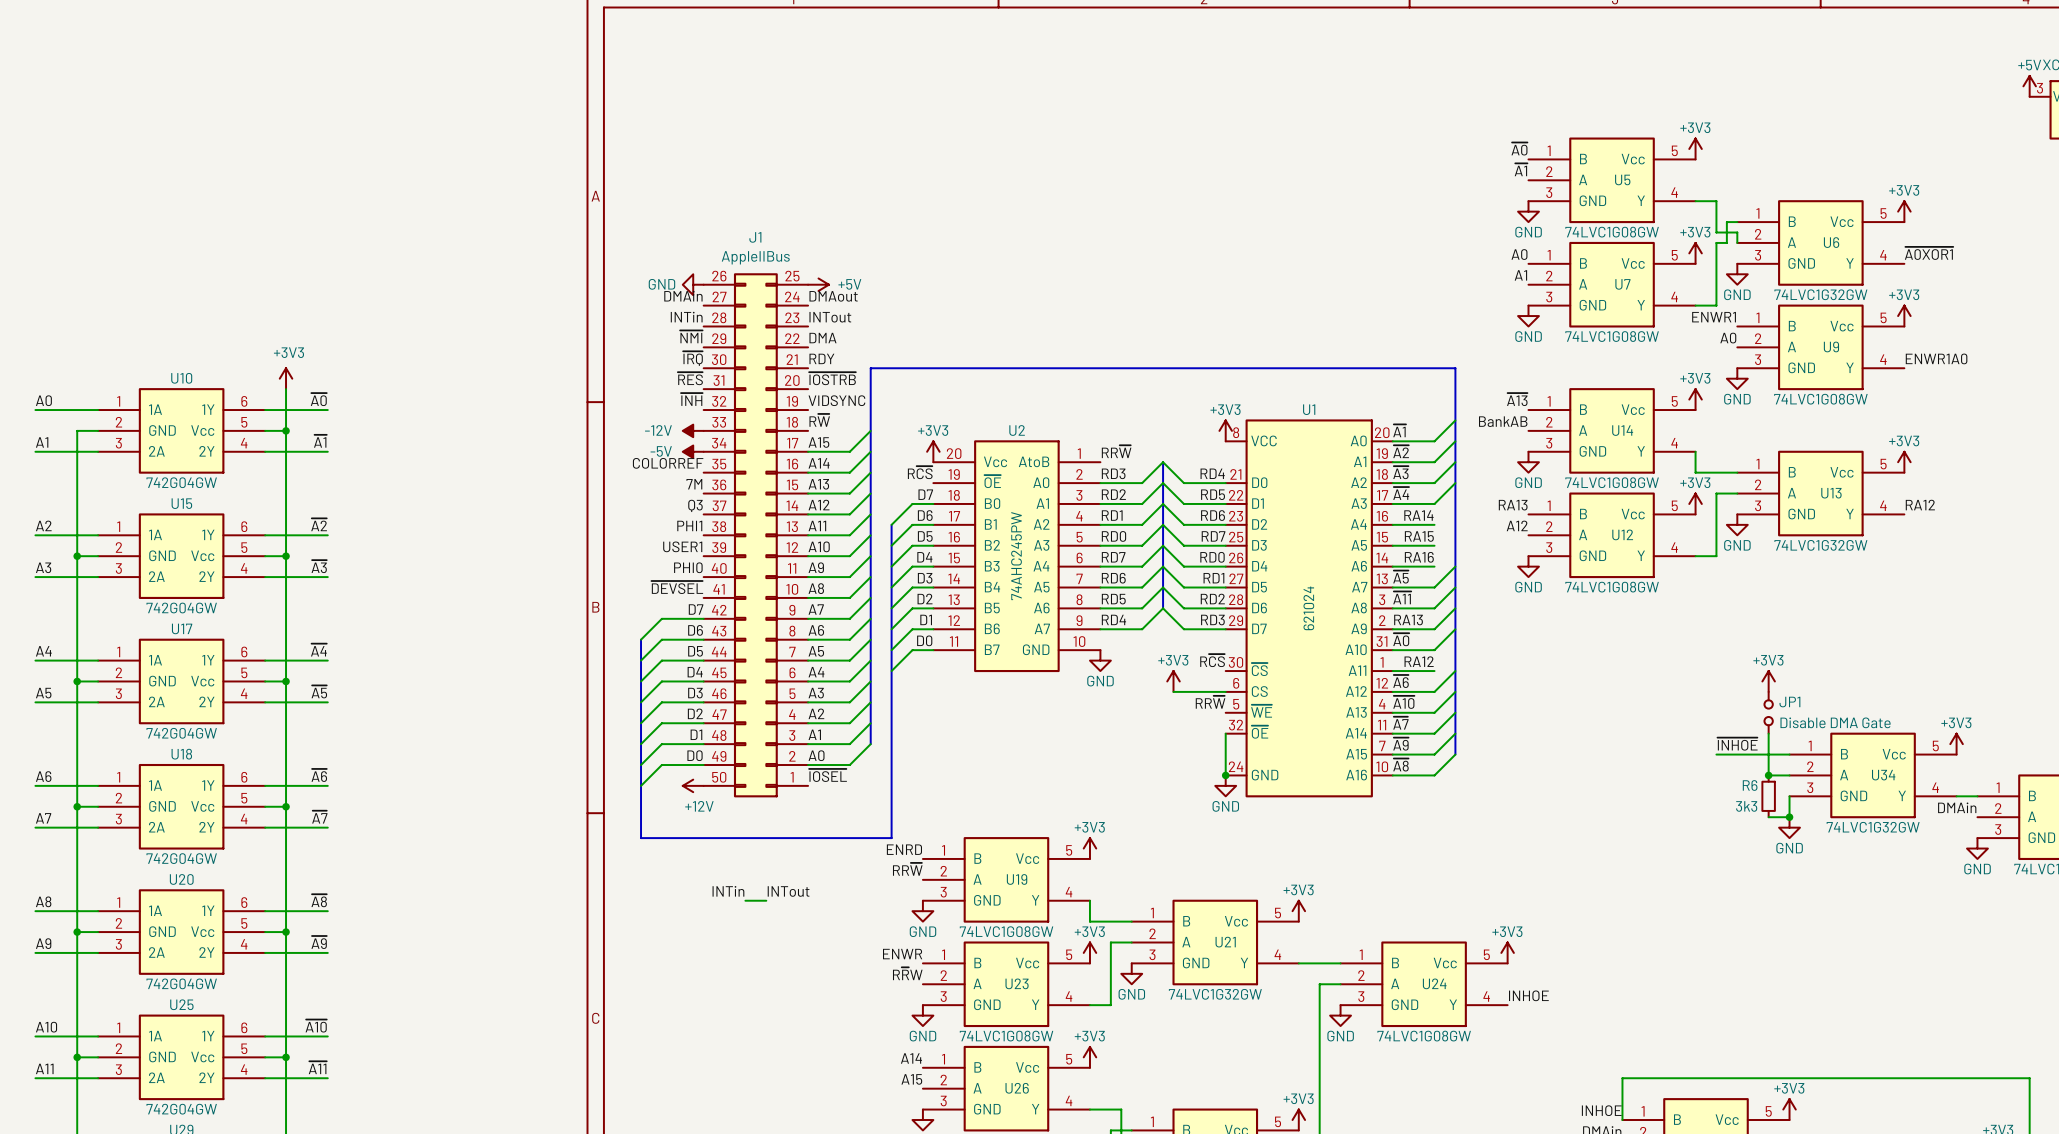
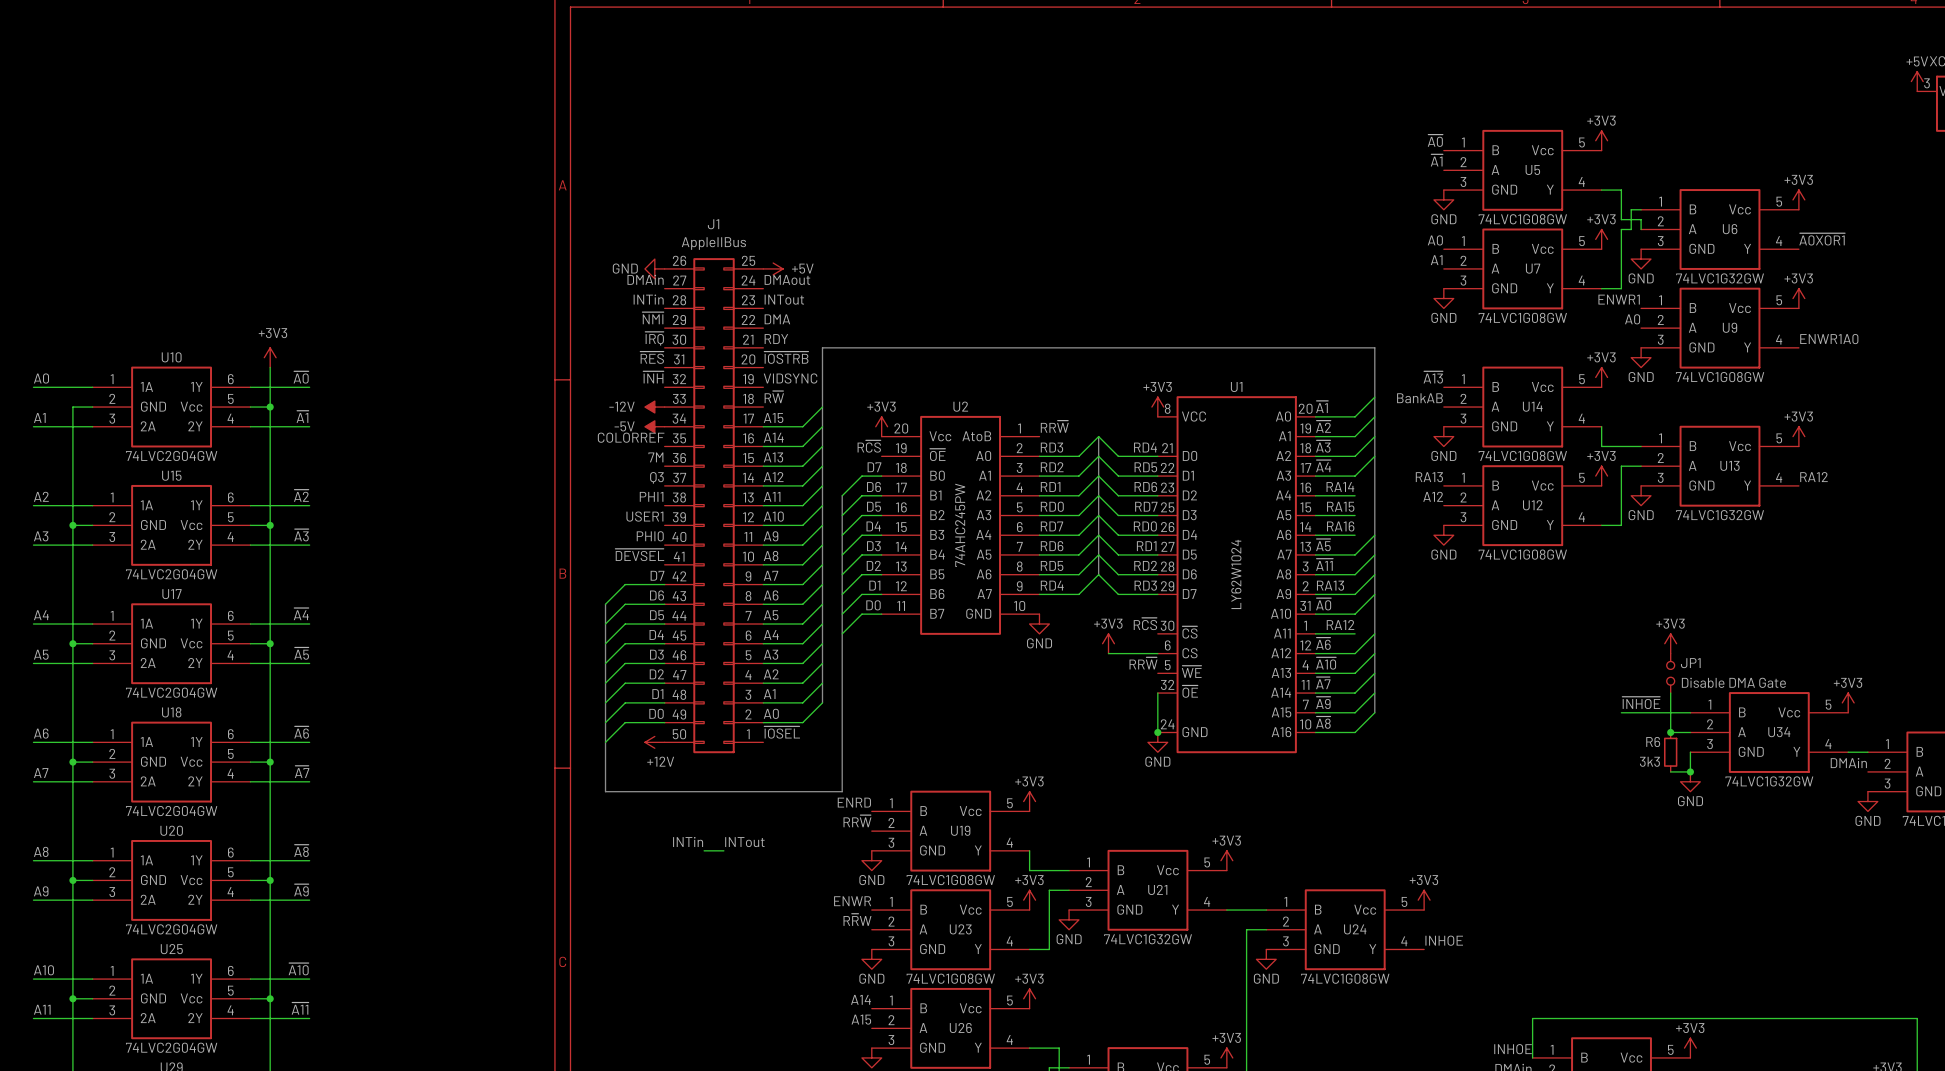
U10 value: 742G04GW (181, 482) -> 74LVC2G04GW (171, 455)
U15 value: 742G04GW (181, 608) -> 74LVC2G04GW (171, 574)
U1 value: 621024 (1308, 608) -> LY62W1024 (1236, 574)
U17 value: 742G04GW (181, 733) -> 74LVC2G04GW (171, 692)
U18 value: 742G04GW (181, 858) -> 74LVC2G04GW (171, 811)
U20 value: 742G04GW (181, 983) -> 74LVC2G04GW (171, 929)
U25 value: 742G04GW (181, 1109) -> 74LVC2G04GW (171, 1047)

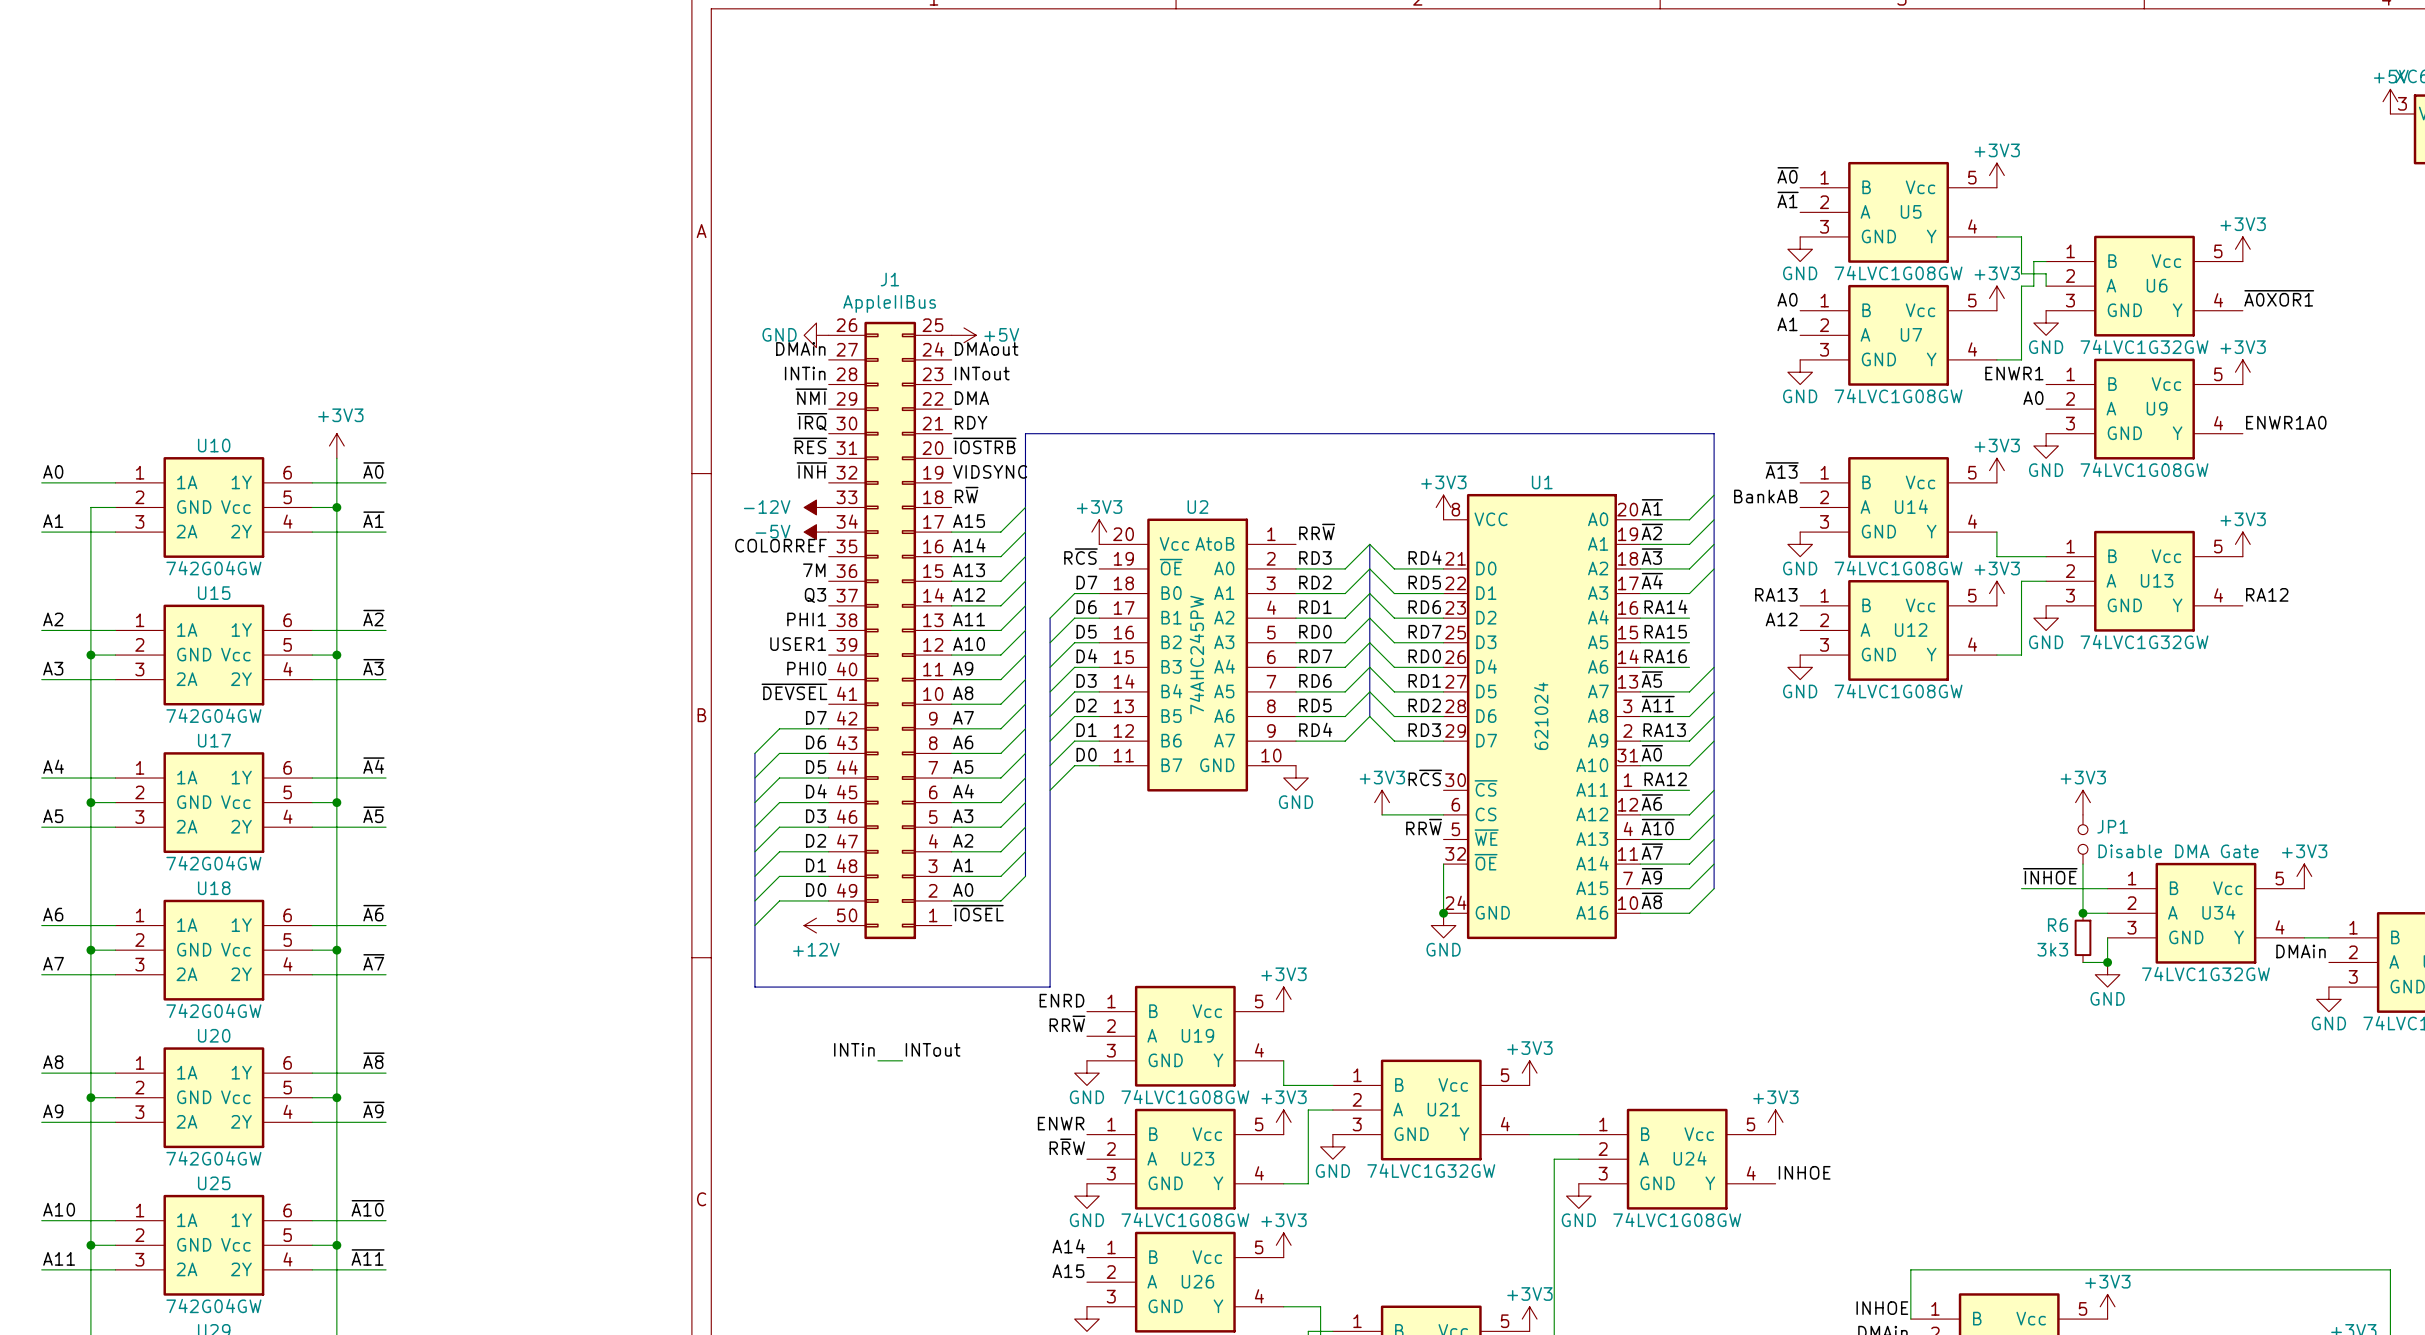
U10 value: 74LVC2G04GW (171, 455) -> 742G04GW (213, 568)
U15 value: 74LVC2G04GW (171, 574) -> 742G04GW (213, 715)
U1 value: LY62W1024 (1236, 574) -> 621024 (1541, 716)
U17 value: 74LVC2G04GW (171, 692) -> 742G04GW (213, 863)
U18 value: 74LVC2G04GW (171, 811) -> 742G04GW (213, 1010)
U20 value: 74LVC2G04GW (171, 929) -> 742G04GW (213, 1158)
U25 value: 74LVC2G04GW (171, 1047) -> 742G04GW (213, 1306)

